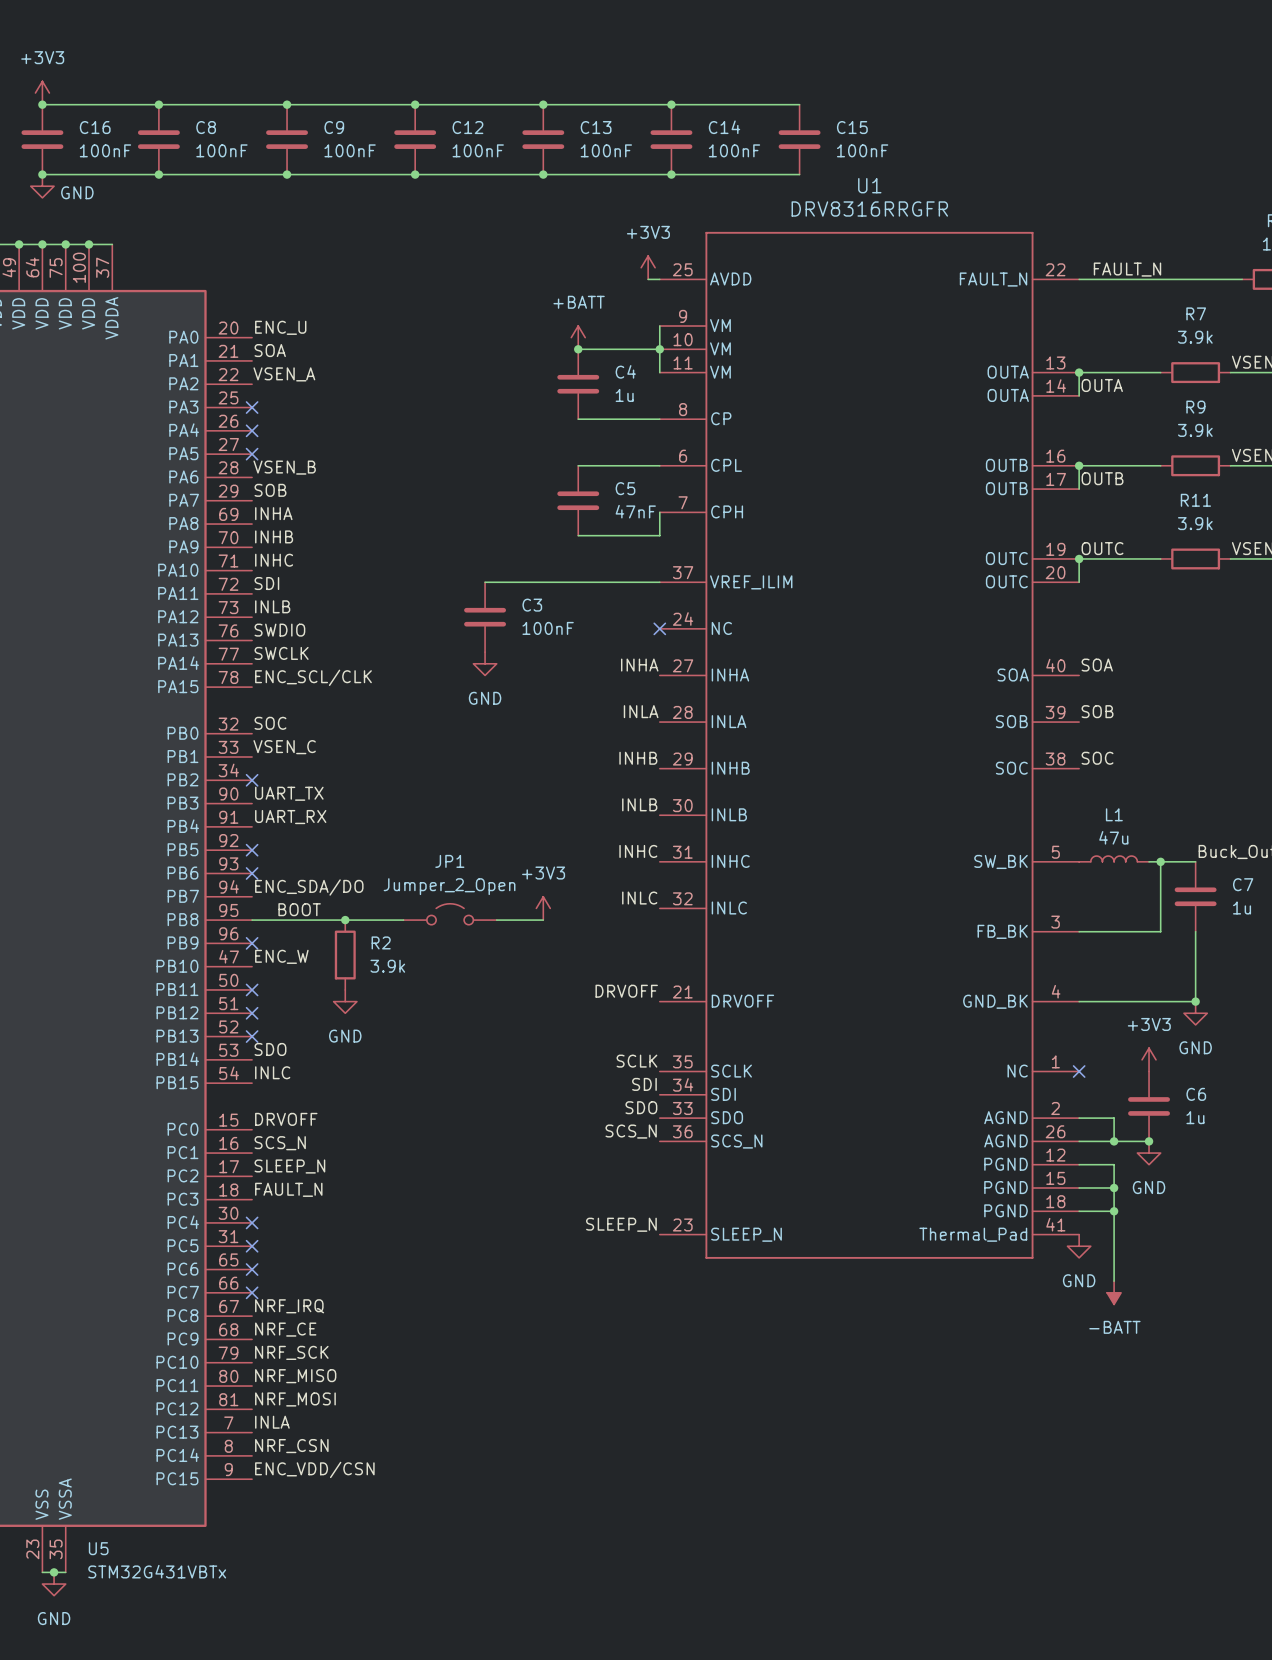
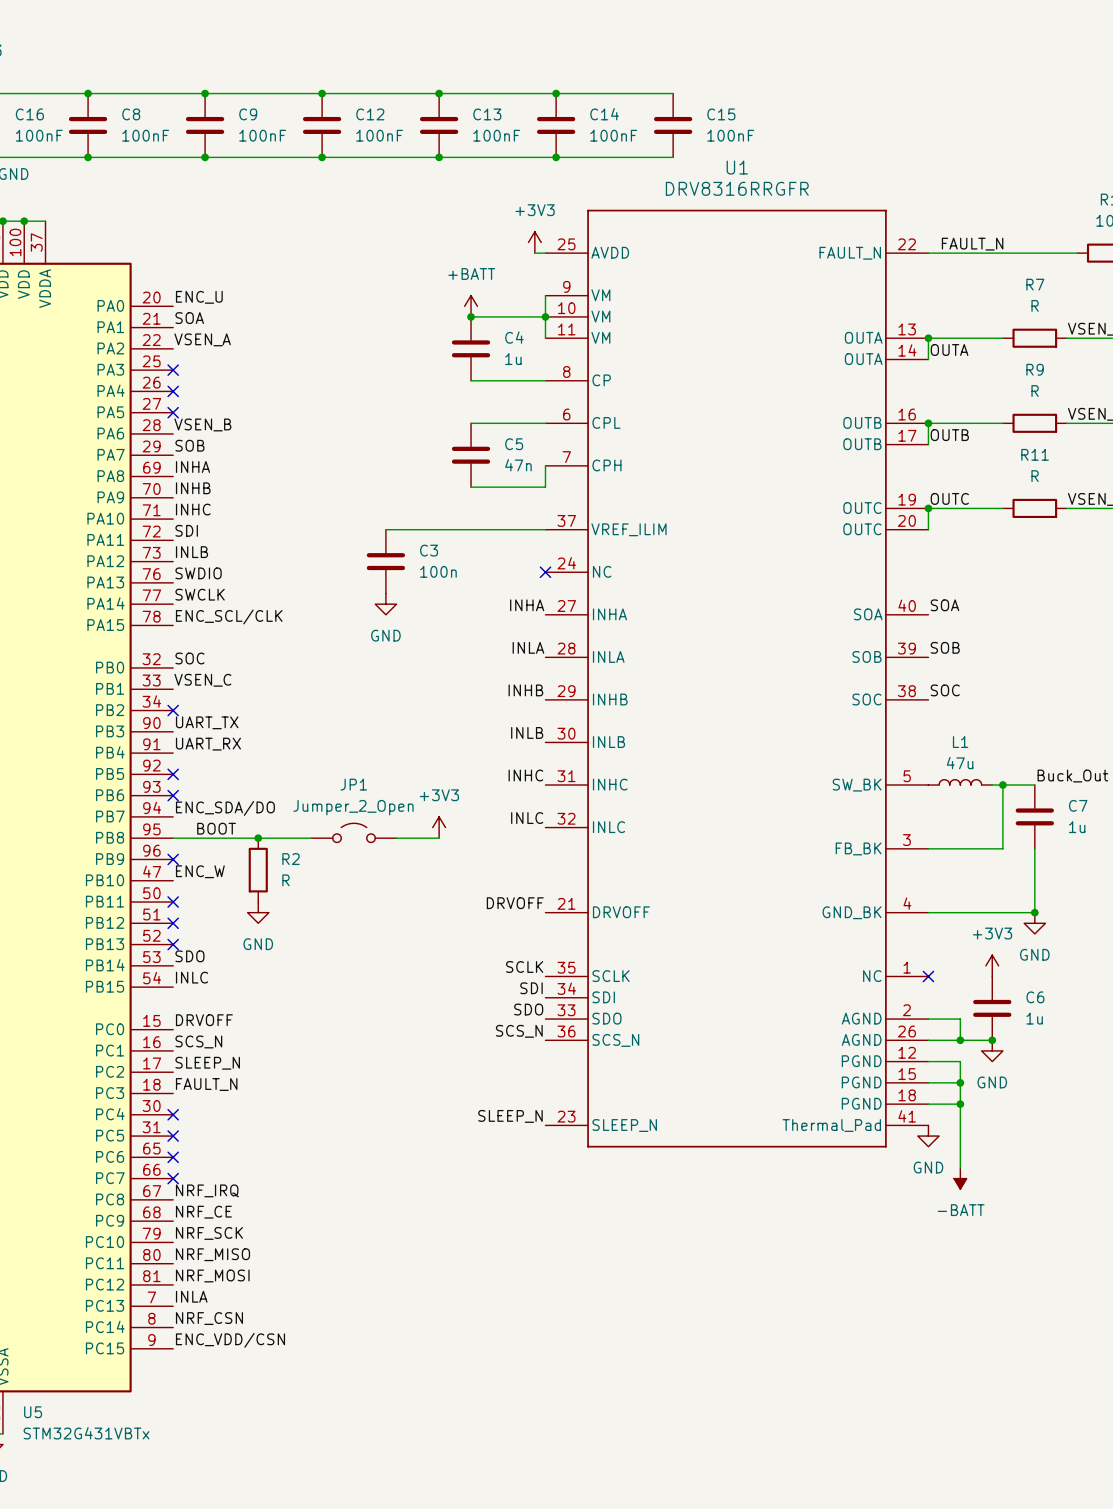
R7 value: 3.9k (1195, 337) -> R (1035, 305)
R9 value: 3.9k (1195, 430) -> R (1035, 391)
C5 value: 47nF (635, 511) -> 47n (518, 465)
R11 value: 3.9k (1195, 523) -> R (1035, 476)
C3 value: 100nF (548, 628) -> 100n (438, 571)
R2 value: 3.9k (387, 966) -> R (285, 880)

